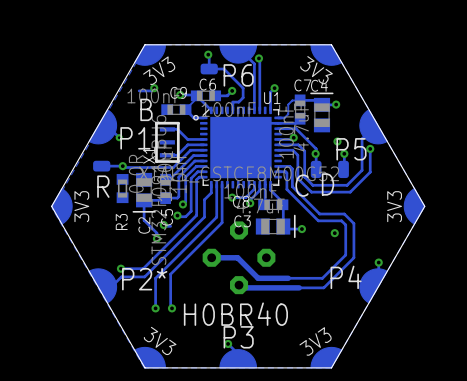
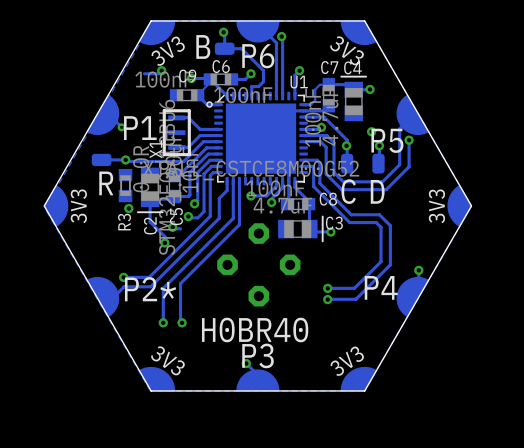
text position: B (146, 109) -> B (203, 46)
text position: D (328, 184) -> D (377, 191)
text position: C (302, 185) -> C (348, 191)
C8 name position: C8 (241, 201) -> C8 (328, 199)
via: none -> (128, 208)
C3 name position: C3 (242, 221) -> C3 (334, 223)
via: (334, 233) -> none
track: (211, 257) (237, 257) (258, 278) (299, 278) -> none
via: none -> (327, 288)
track: (239, 285) (241, 287) (299, 287) -> none
via: none -> (327, 299)

